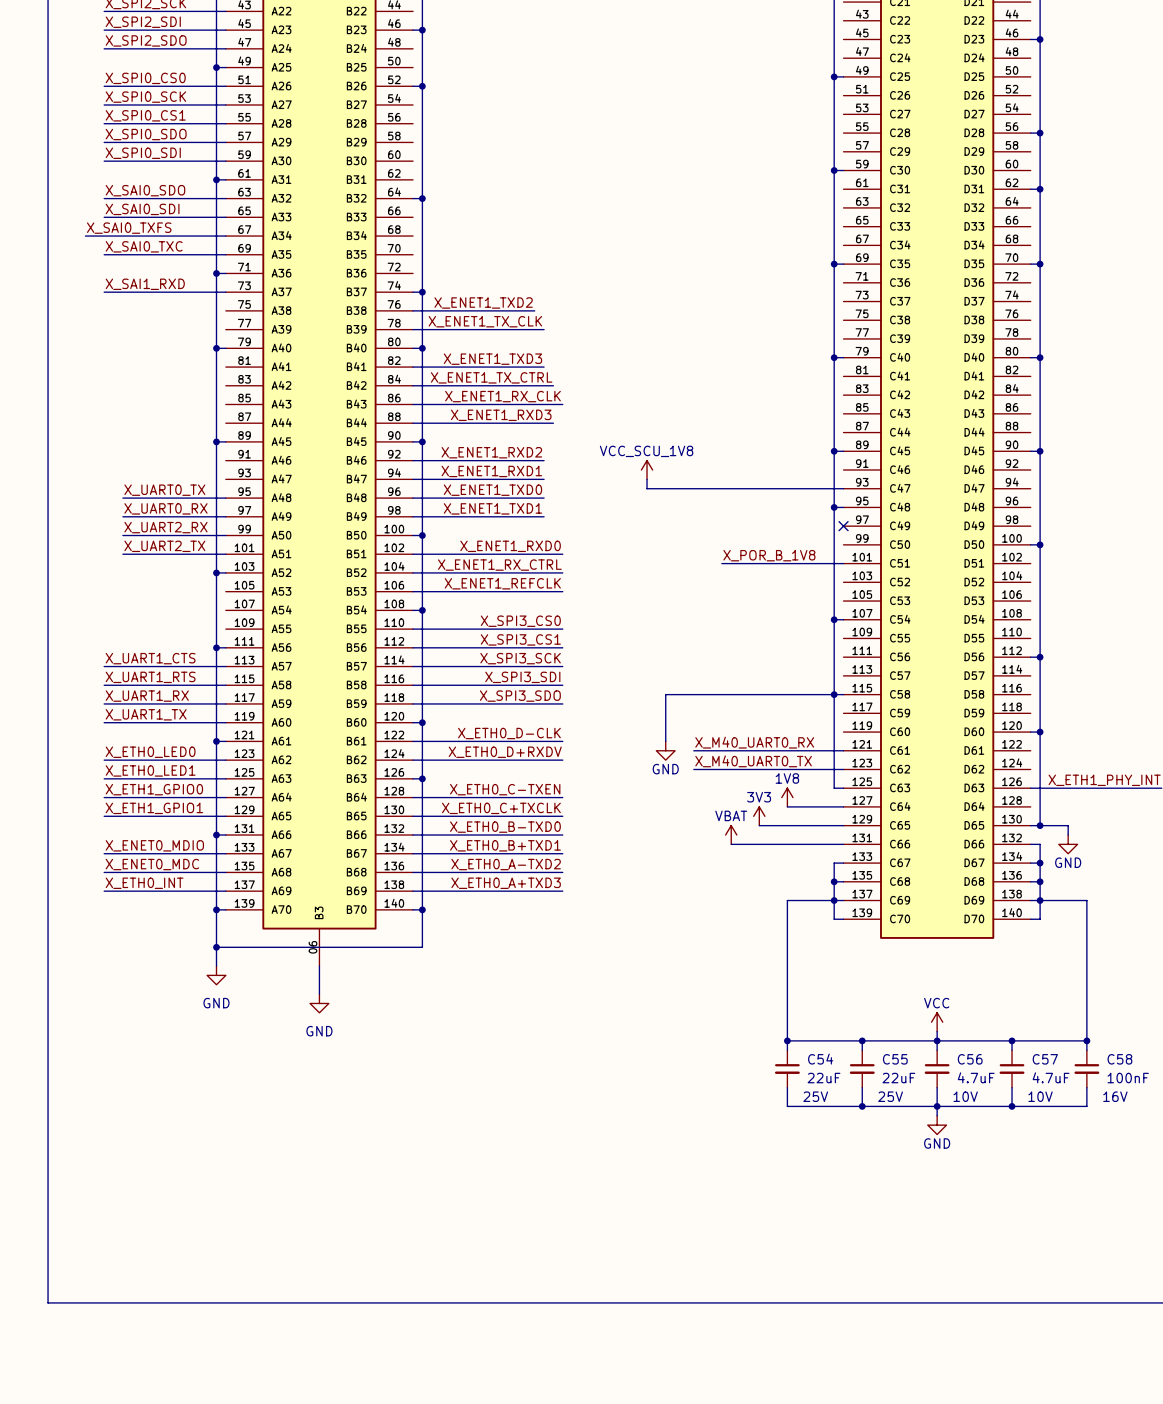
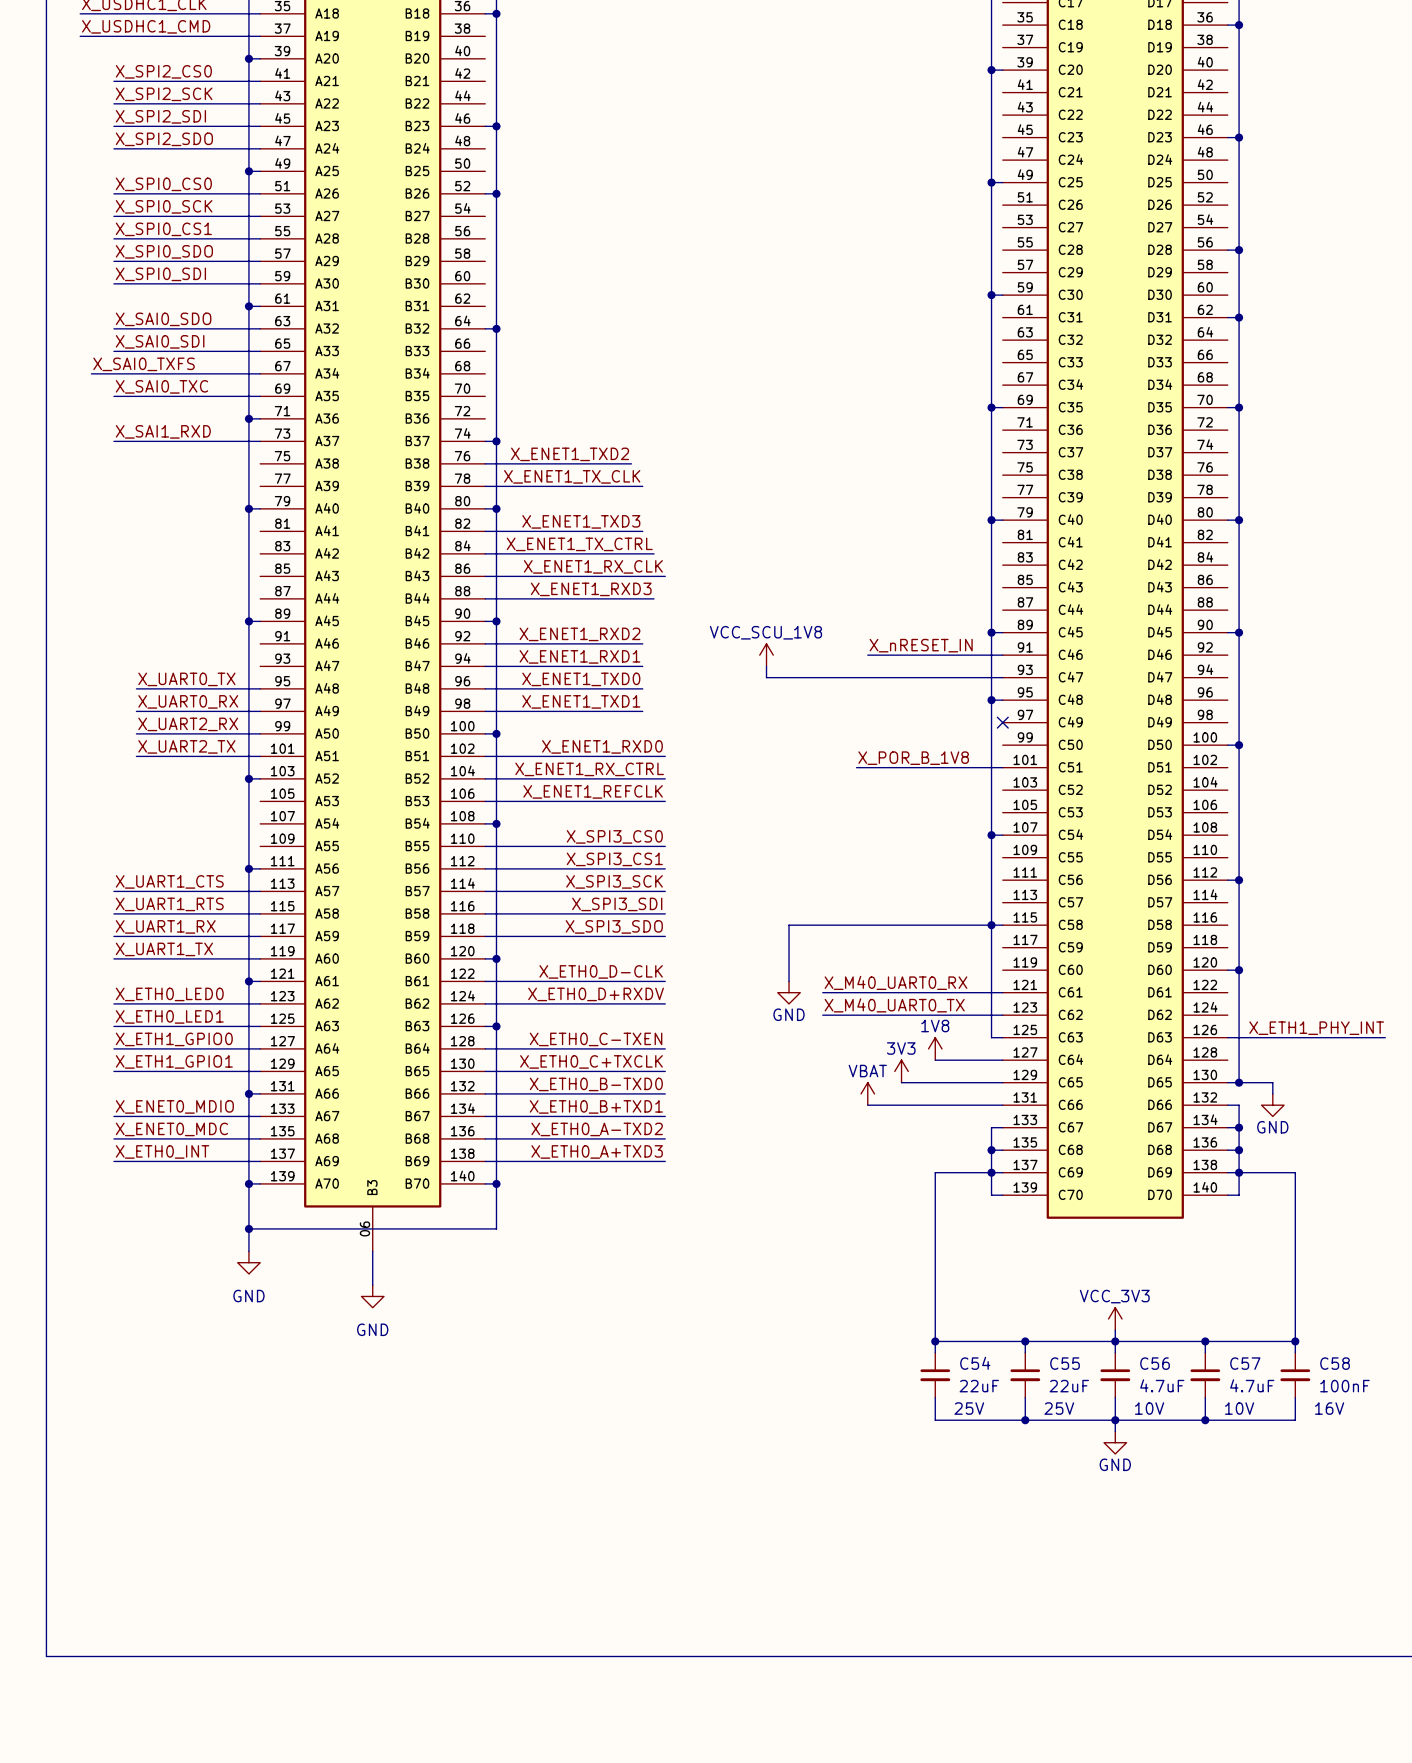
label: none -> X_nRESET_IN (921, 645)
wire: none -> (867, 655) (1002, 655)
power symbol: VCC (937, 1022) -> VCC_3V3 (1115, 1318)

